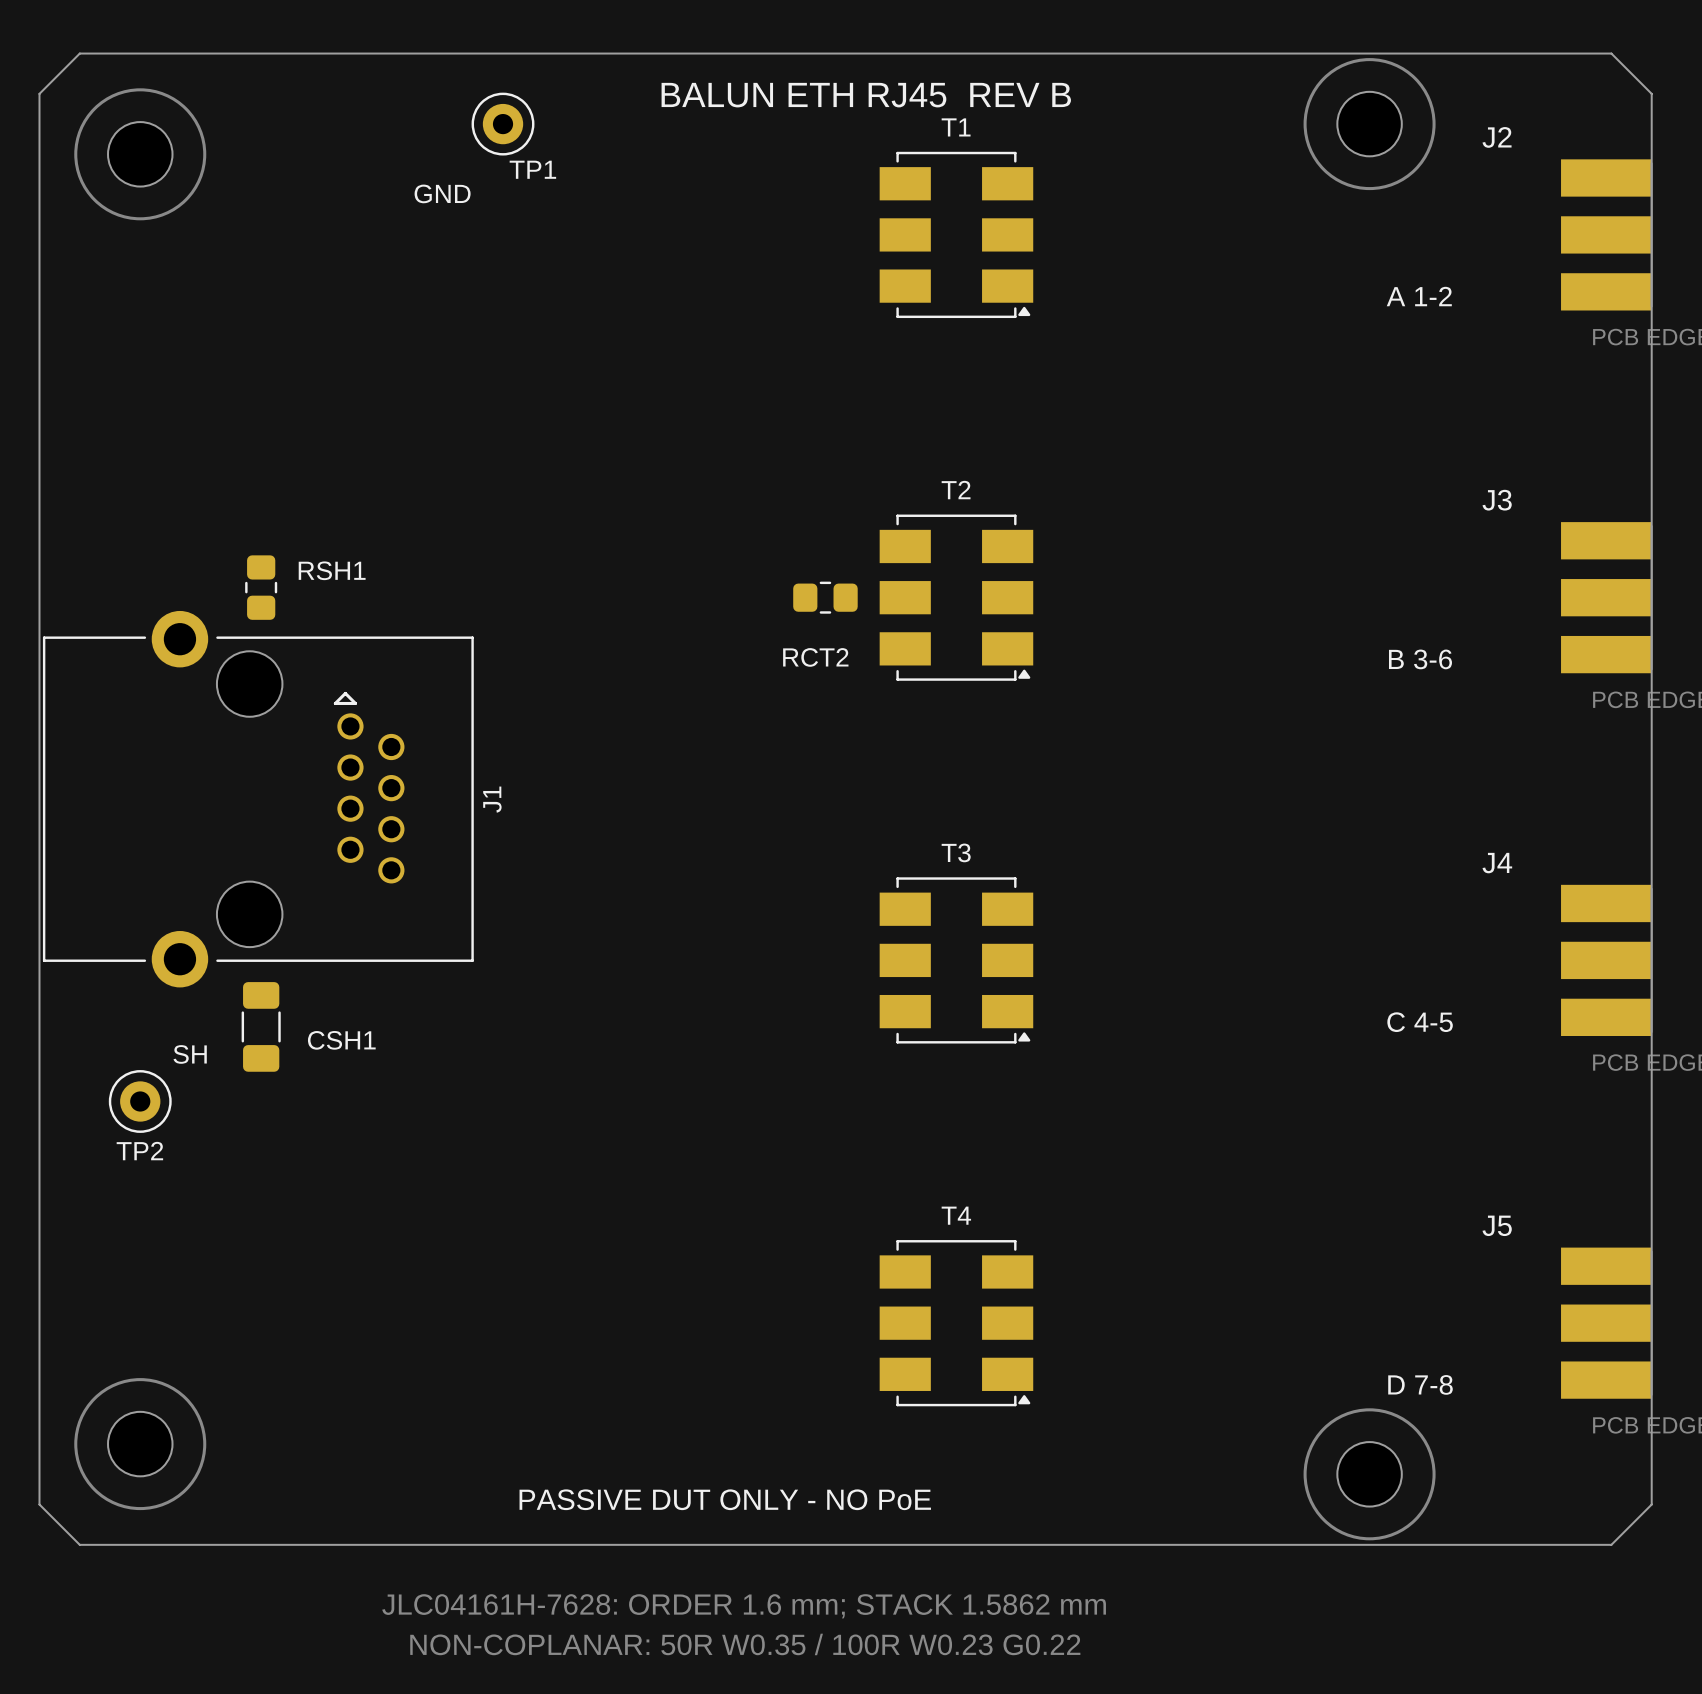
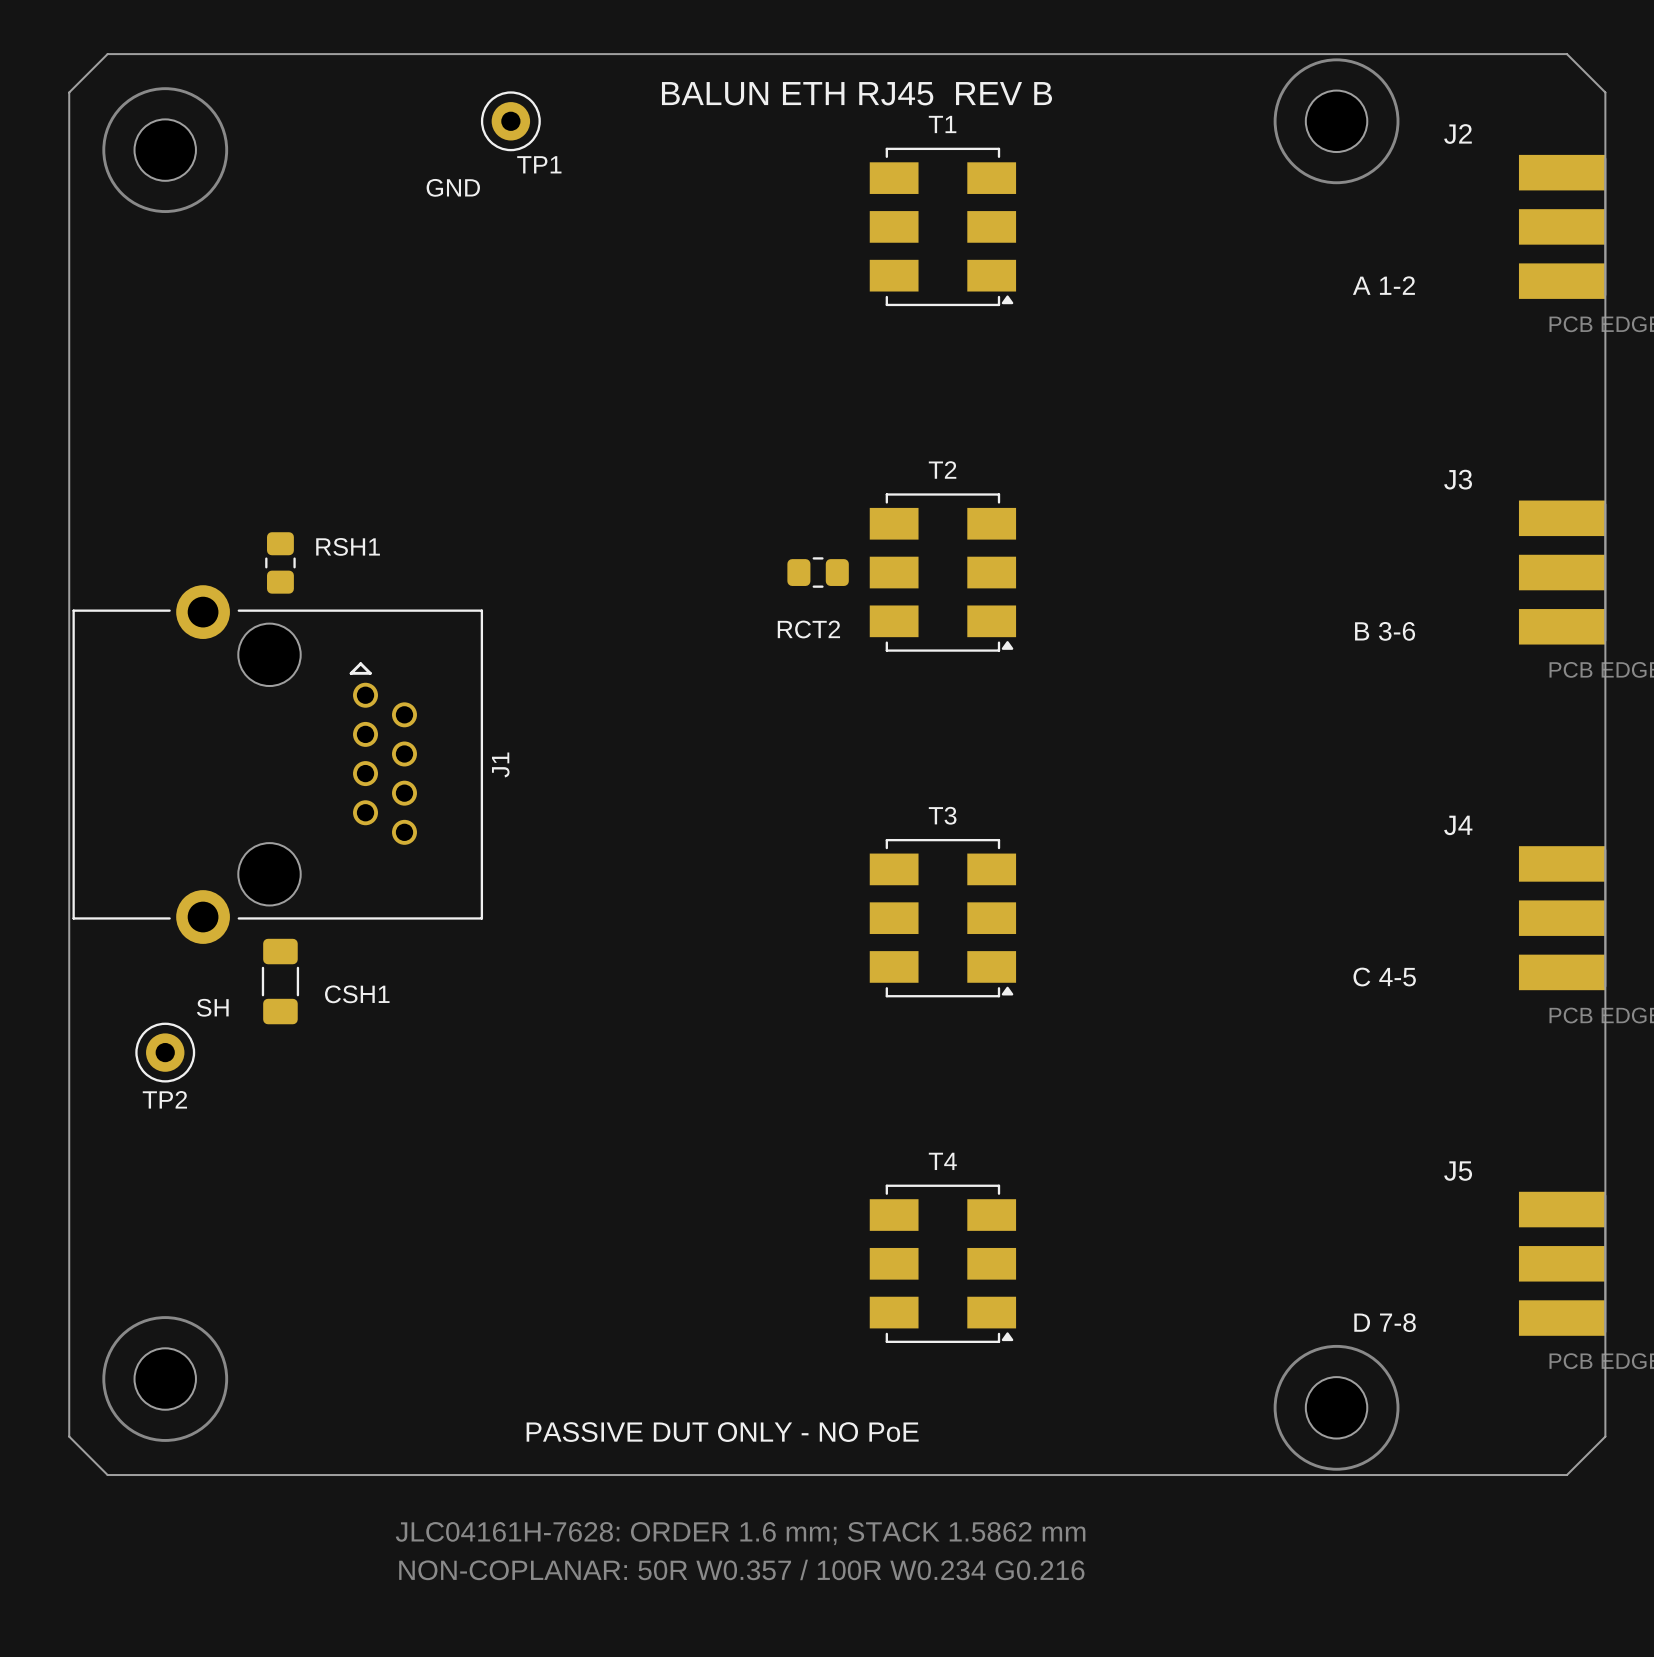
text: NON-COPLANAR: 50R W0.35 / 100R W0.23 G0.22 (745, 1644) -> NON-COPLANAR: 50R W0.357 / 100R W0.234 G0.216 (741, 1569)

